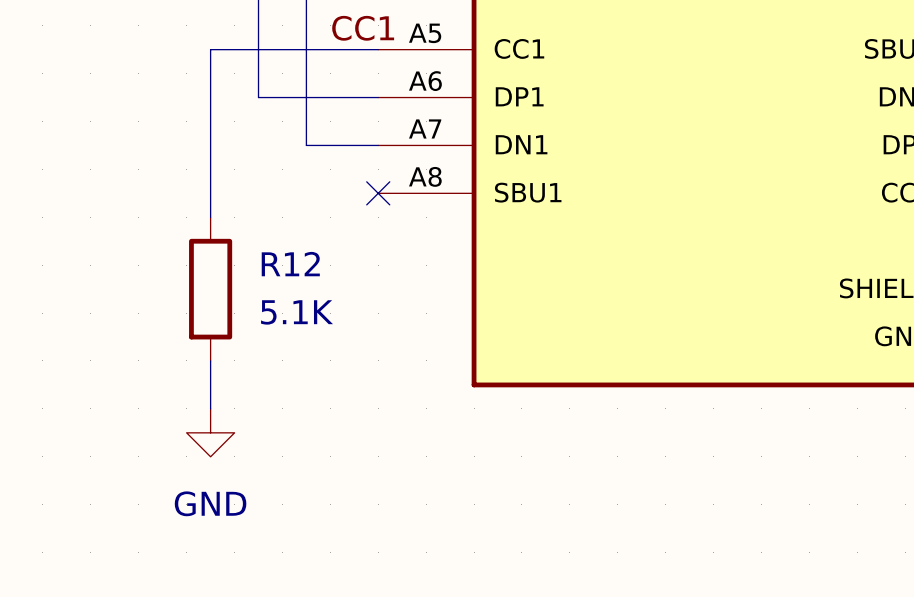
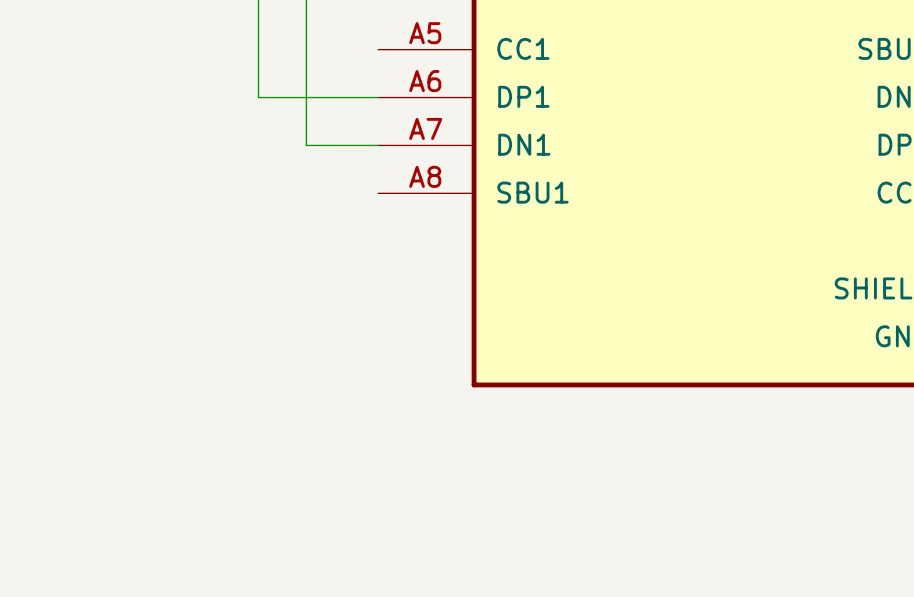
label: CC1 (363, 28) -> none
wire: (378, 49) (210, 49) (210, 217) -> none
no-connect mark: (378, 193) -> none
R12: 5.1K (210, 289) -> none
wire: (210, 360) (210, 408) -> none
power symbol: GND (210, 432) -> none

